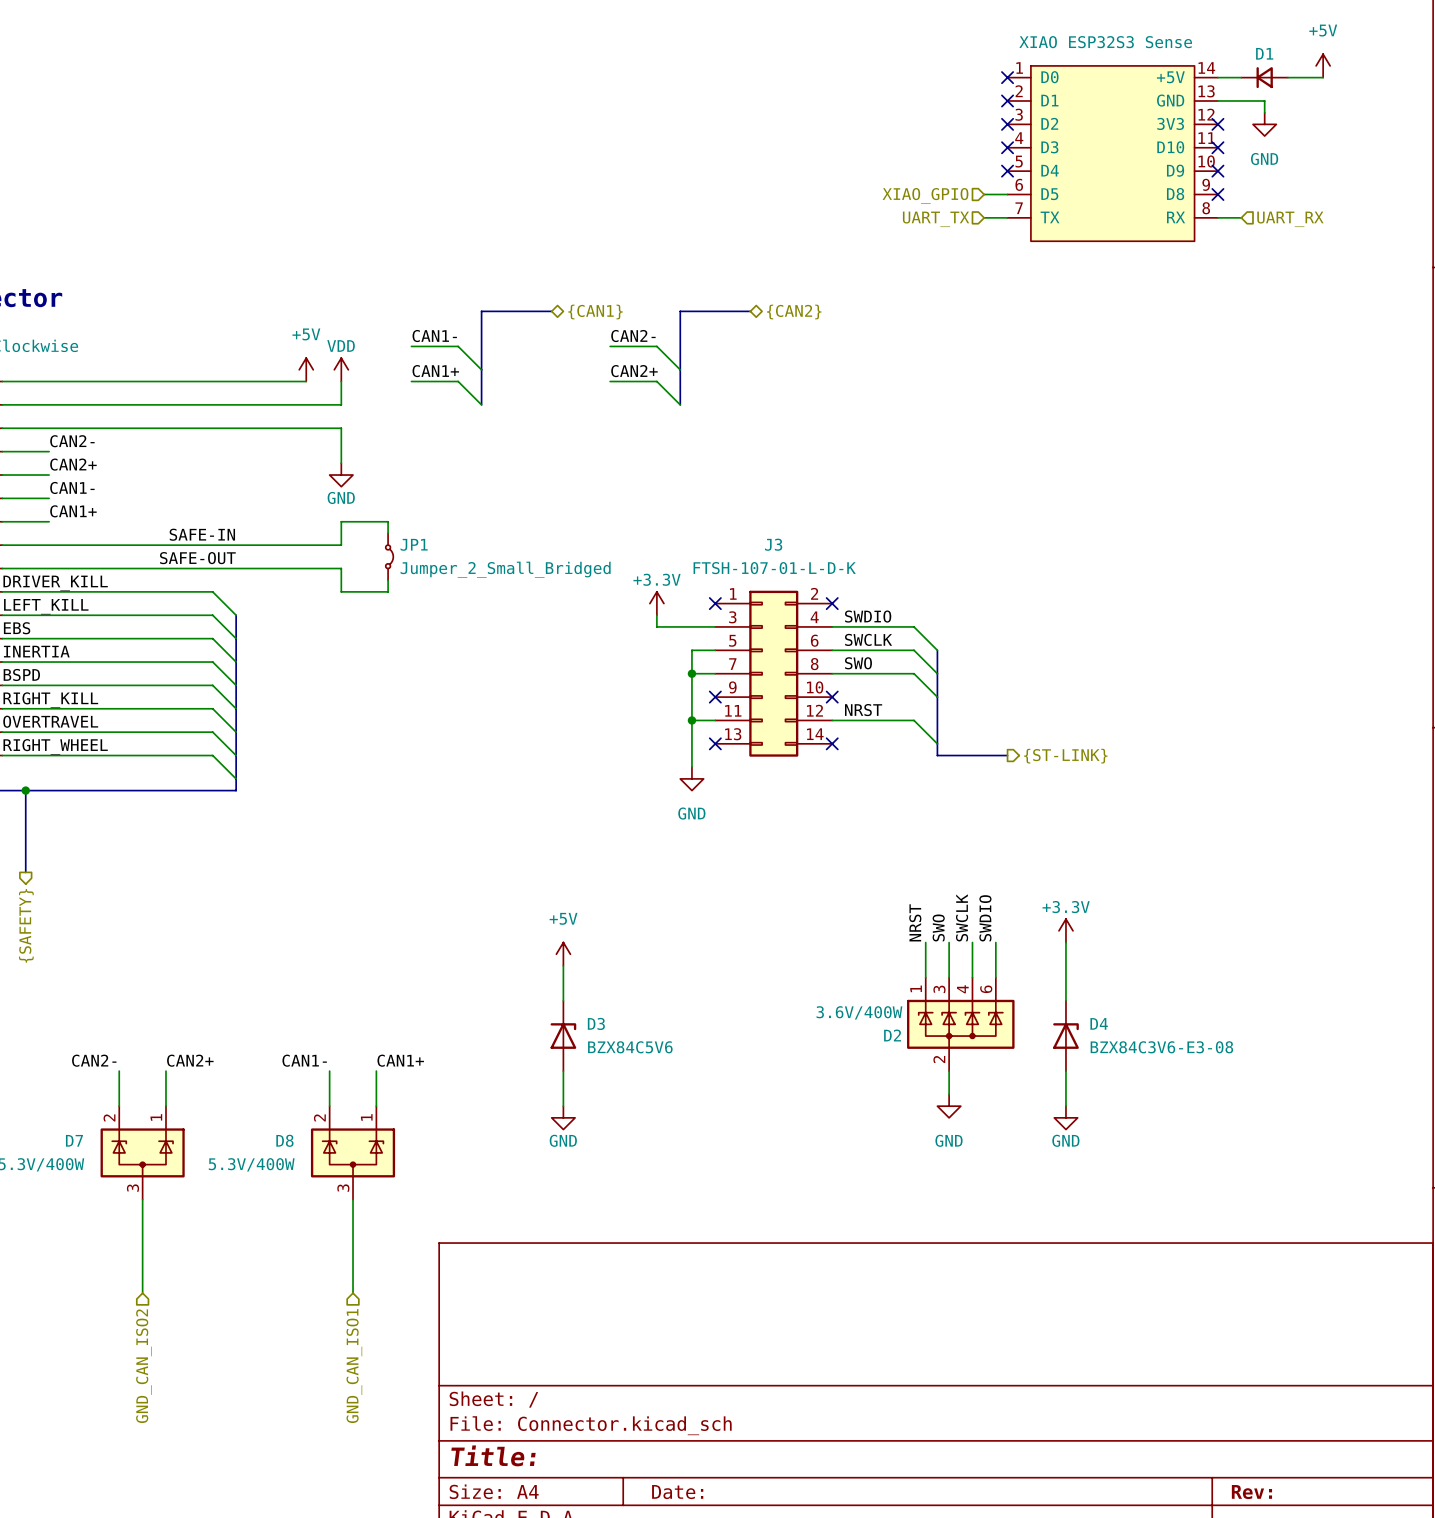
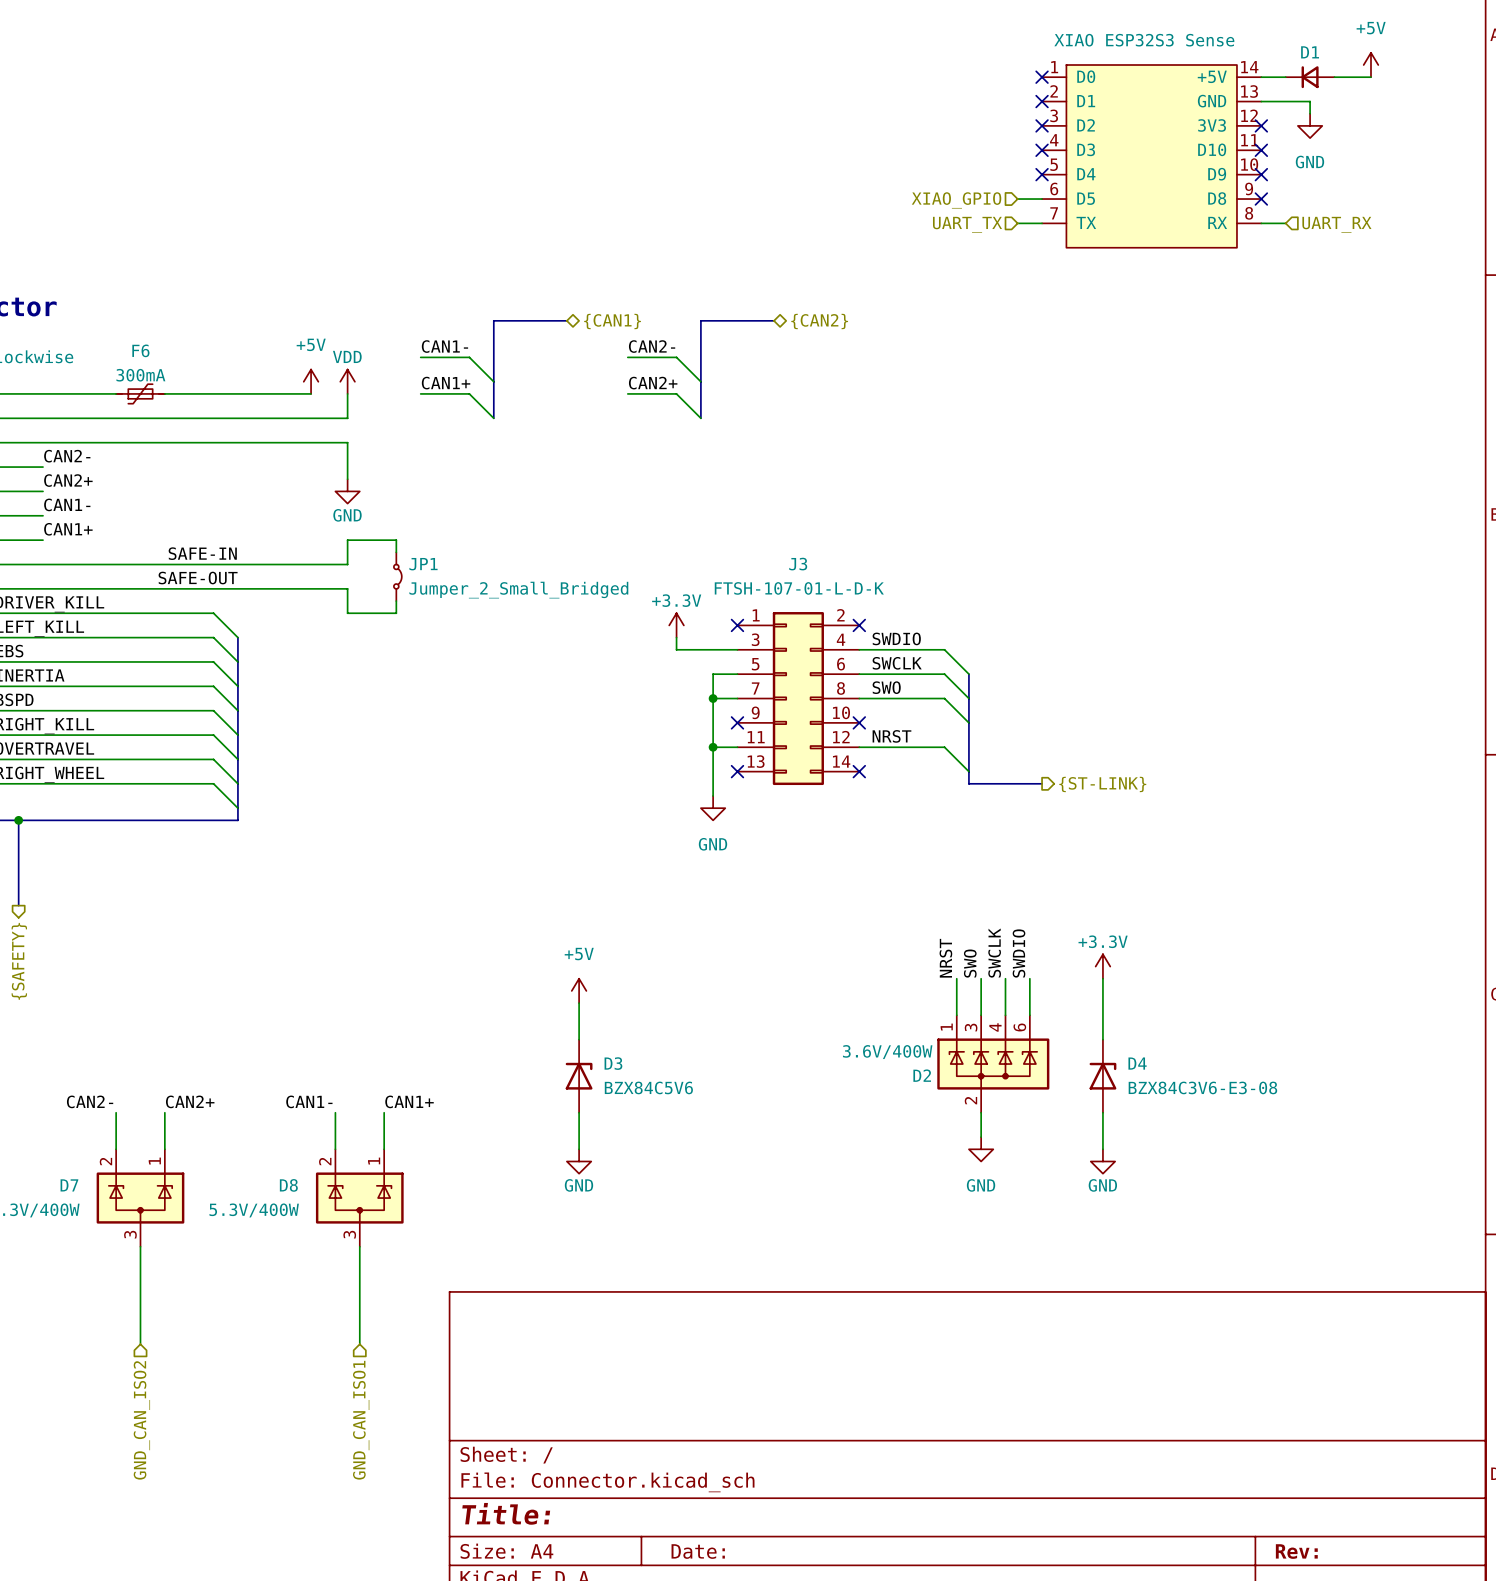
F6: none -> 300mA (140, 393)

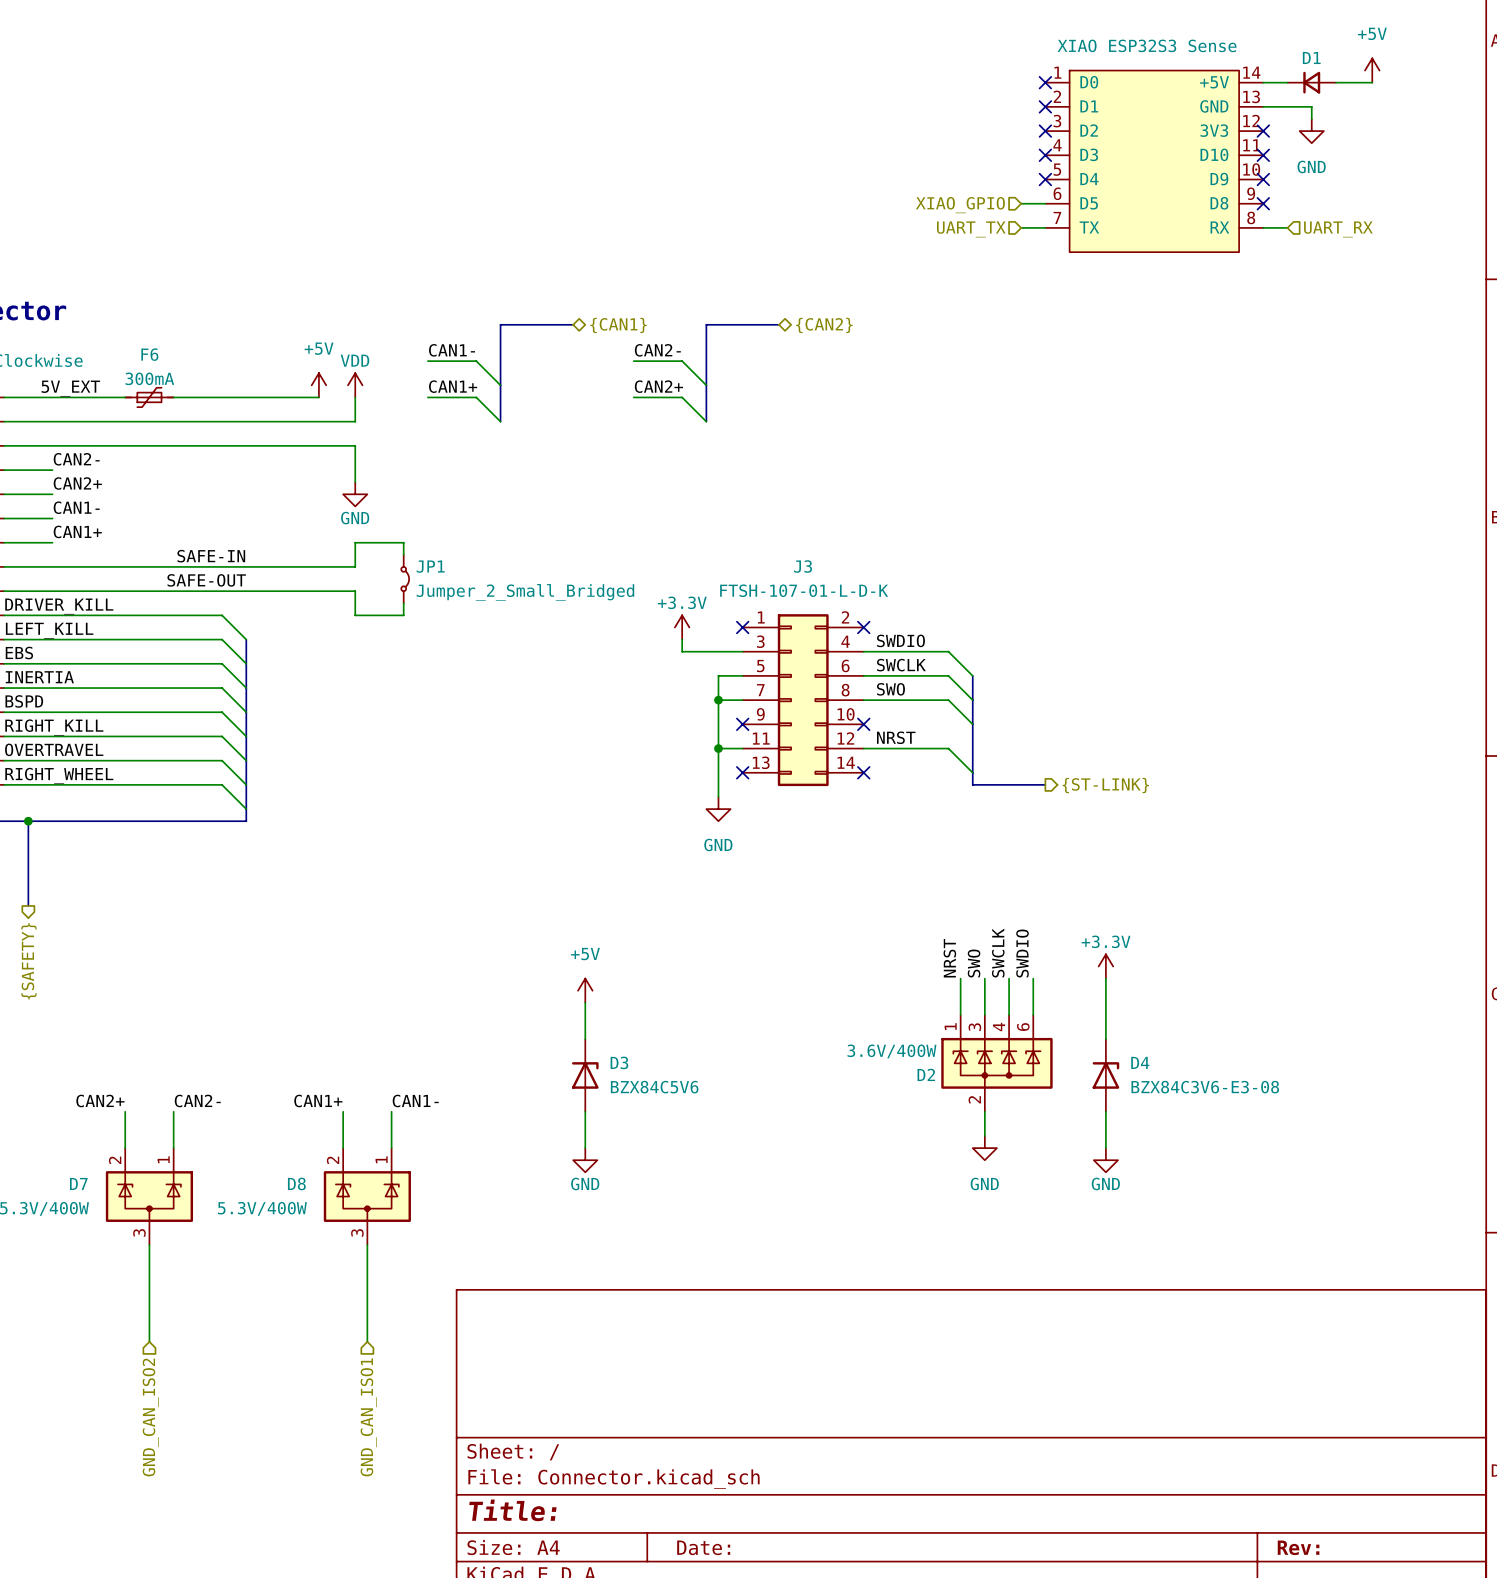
label: none -> 5V_EXT (70, 388)
label: CAN2- (90, 1101) -> CAN2+ (100, 1100)
label: CAN2+ (190, 1101) -> CAN2- (197, 1100)
label: CAN1- (309, 1101) -> CAN1+ (318, 1100)
label: CAN1+ (409, 1101) -> CAN1- (415, 1100)

